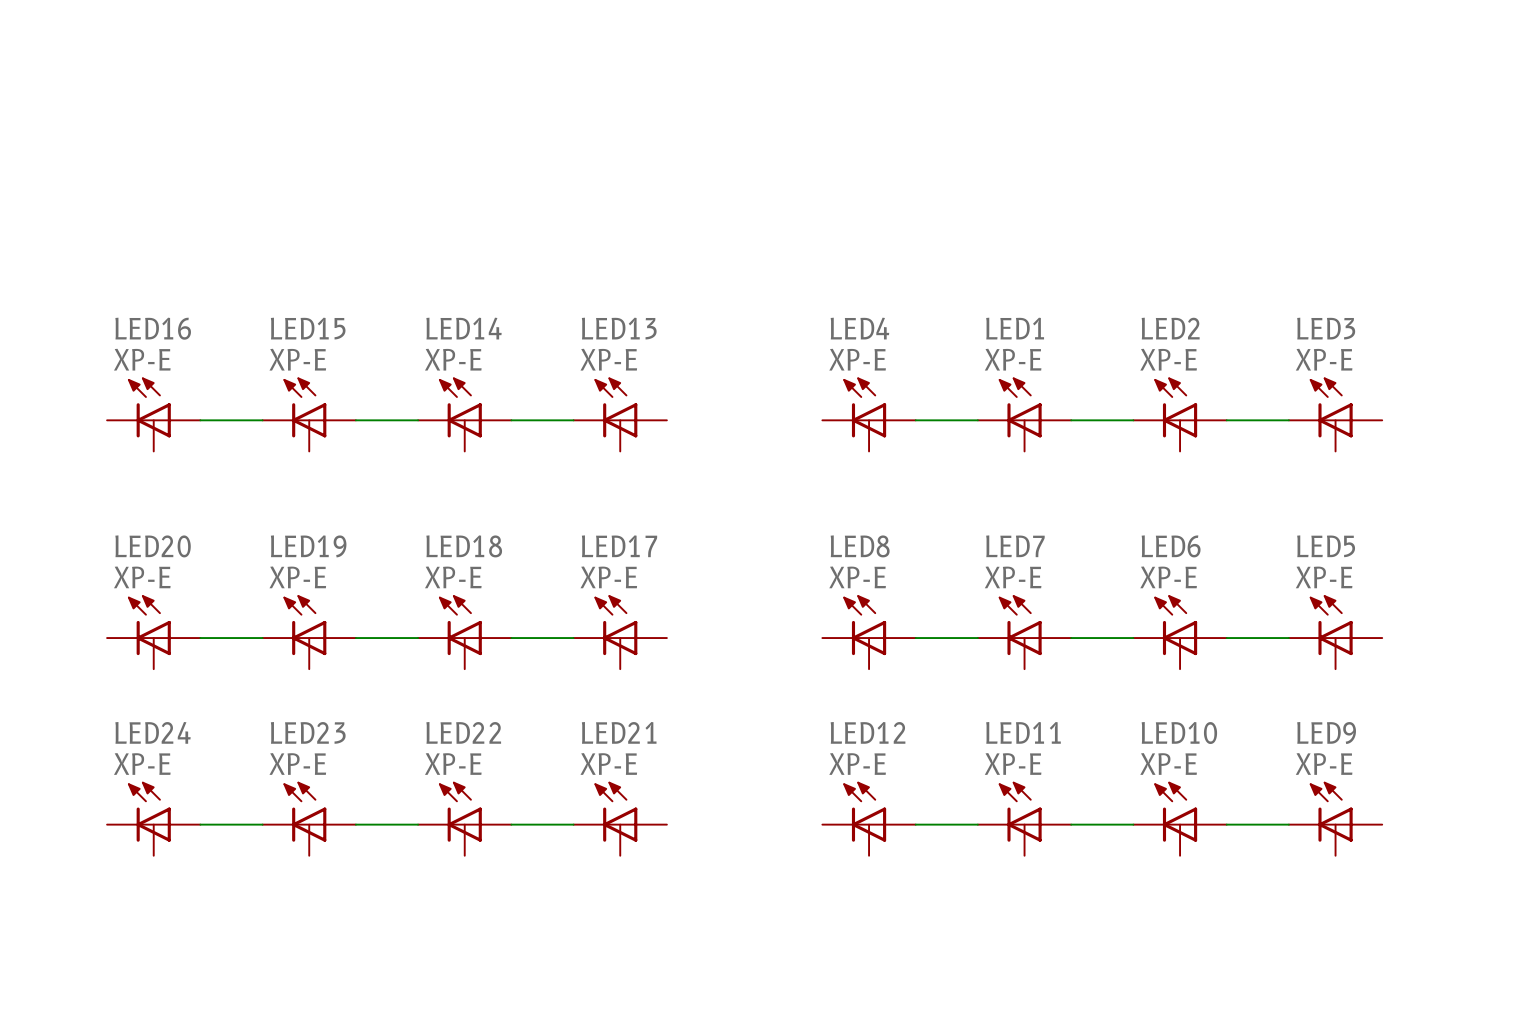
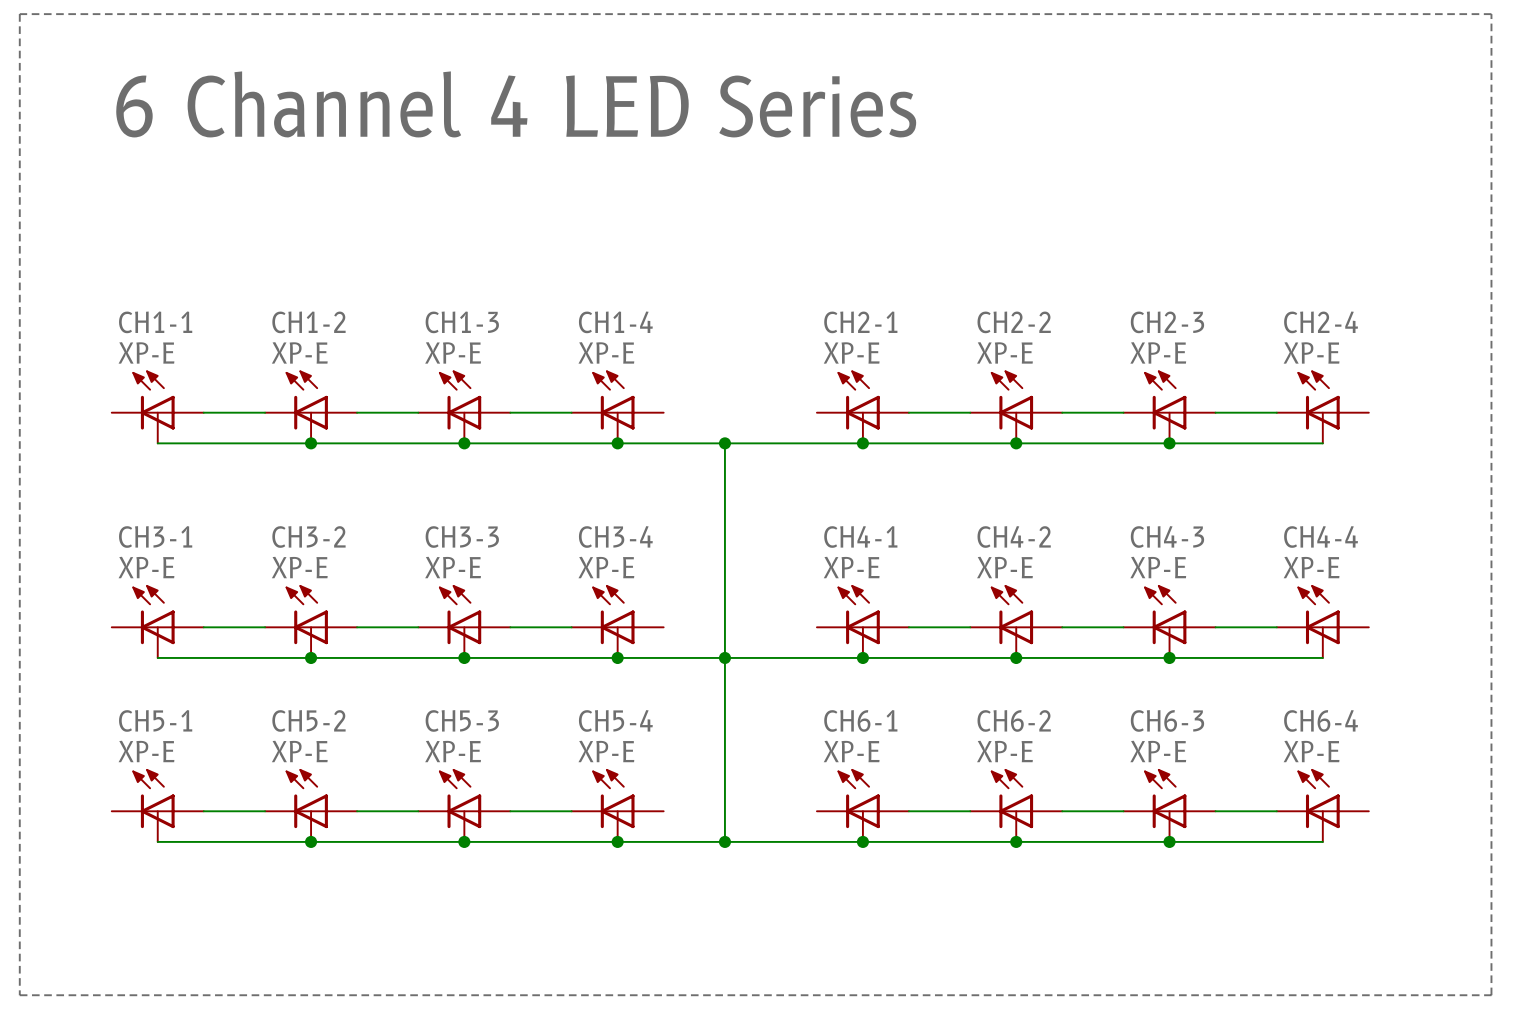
line: none -> (19, 14) (1491, 14) (1491, 995) (19, 995) (19, 14)
text: none -> 6 Channel 4 LED Series (516, 104)
LED16 name: LED16 (153, 328) -> CH1-1 (155, 322)
LED15 name: LED15 (308, 328) -> CH1-2 (308, 322)
LED14 name: LED14 (464, 328) -> CH1-3 (462, 322)
LED13 name: LED13 (619, 328) -> CH1-4 (615, 322)
LED4 name: LED4 (859, 328) -> CH2-1 (860, 322)
LED1 name: LED1 (1015, 328) -> CH2-2 (1014, 322)
LED2 name: LED2 (1170, 328) -> CH2-3 (1167, 322)
LED3 name: LED3 (1326, 328) -> CH2-4 (1321, 322)
wire: none -> (157, 443) (1322, 443)
junction: none -> (311, 443)
junction: none -> (464, 443)
junction: none -> (617, 443)
wire: none -> (724, 443) (724, 841)
junction: none -> (724, 443)
junction: none -> (862, 443)
junction: none -> (1016, 443)
junction: none -> (1169, 443)
LED20 name: LED20 (153, 546) -> CH3-1 (155, 536)
LED19 name: LED19 (308, 546) -> CH3-2 (308, 536)
LED18 name: LED18 (464, 546) -> CH3-3 (462, 536)
LED17 name: LED17 (619, 546) -> CH3-4 (615, 536)
LED8 name: LED8 (860, 546) -> CH4-1 (860, 536)
LED7 name: LED7 (1015, 546) -> CH4-2 (1014, 536)
LED6 name: LED6 (1171, 546) -> CH4-3 (1167, 536)
LED5 name: LED5 (1326, 546) -> CH4-4 (1321, 536)
wire: none -> (157, 657) (1322, 657)
junction: none -> (311, 657)
junction: none -> (464, 657)
junction: none -> (617, 657)
junction: none -> (724, 657)
junction: none -> (862, 657)
junction: none -> (1016, 657)
junction: none -> (1169, 657)
LED24 name: LED24 (153, 732) -> CH5-1 (155, 720)
LED23 name: LED23 (308, 732) -> CH5-2 (308, 720)
LED22 name: LED22 (463, 732) -> CH5-3 (462, 720)
LED21 name: LED21 (619, 732) -> CH5-4 (615, 720)
LED12 name: LED12 (868, 732) -> CH6-1 (860, 720)
LED11 name: LED11 (1023, 732) -> CH6-2 (1014, 720)
LED10 name: LED10 (1179, 733) -> CH6-3 (1167, 720)
LED9 name: LED9 (1326, 733) -> CH6-4 (1321, 720)
wire: none -> (157, 841) (1322, 841)
junction: none -> (311, 841)
junction: none -> (464, 841)
junction: none -> (617, 841)
junction: none -> (724, 841)
junction: none -> (862, 841)
junction: none -> (1016, 841)
junction: none -> (1169, 841)

